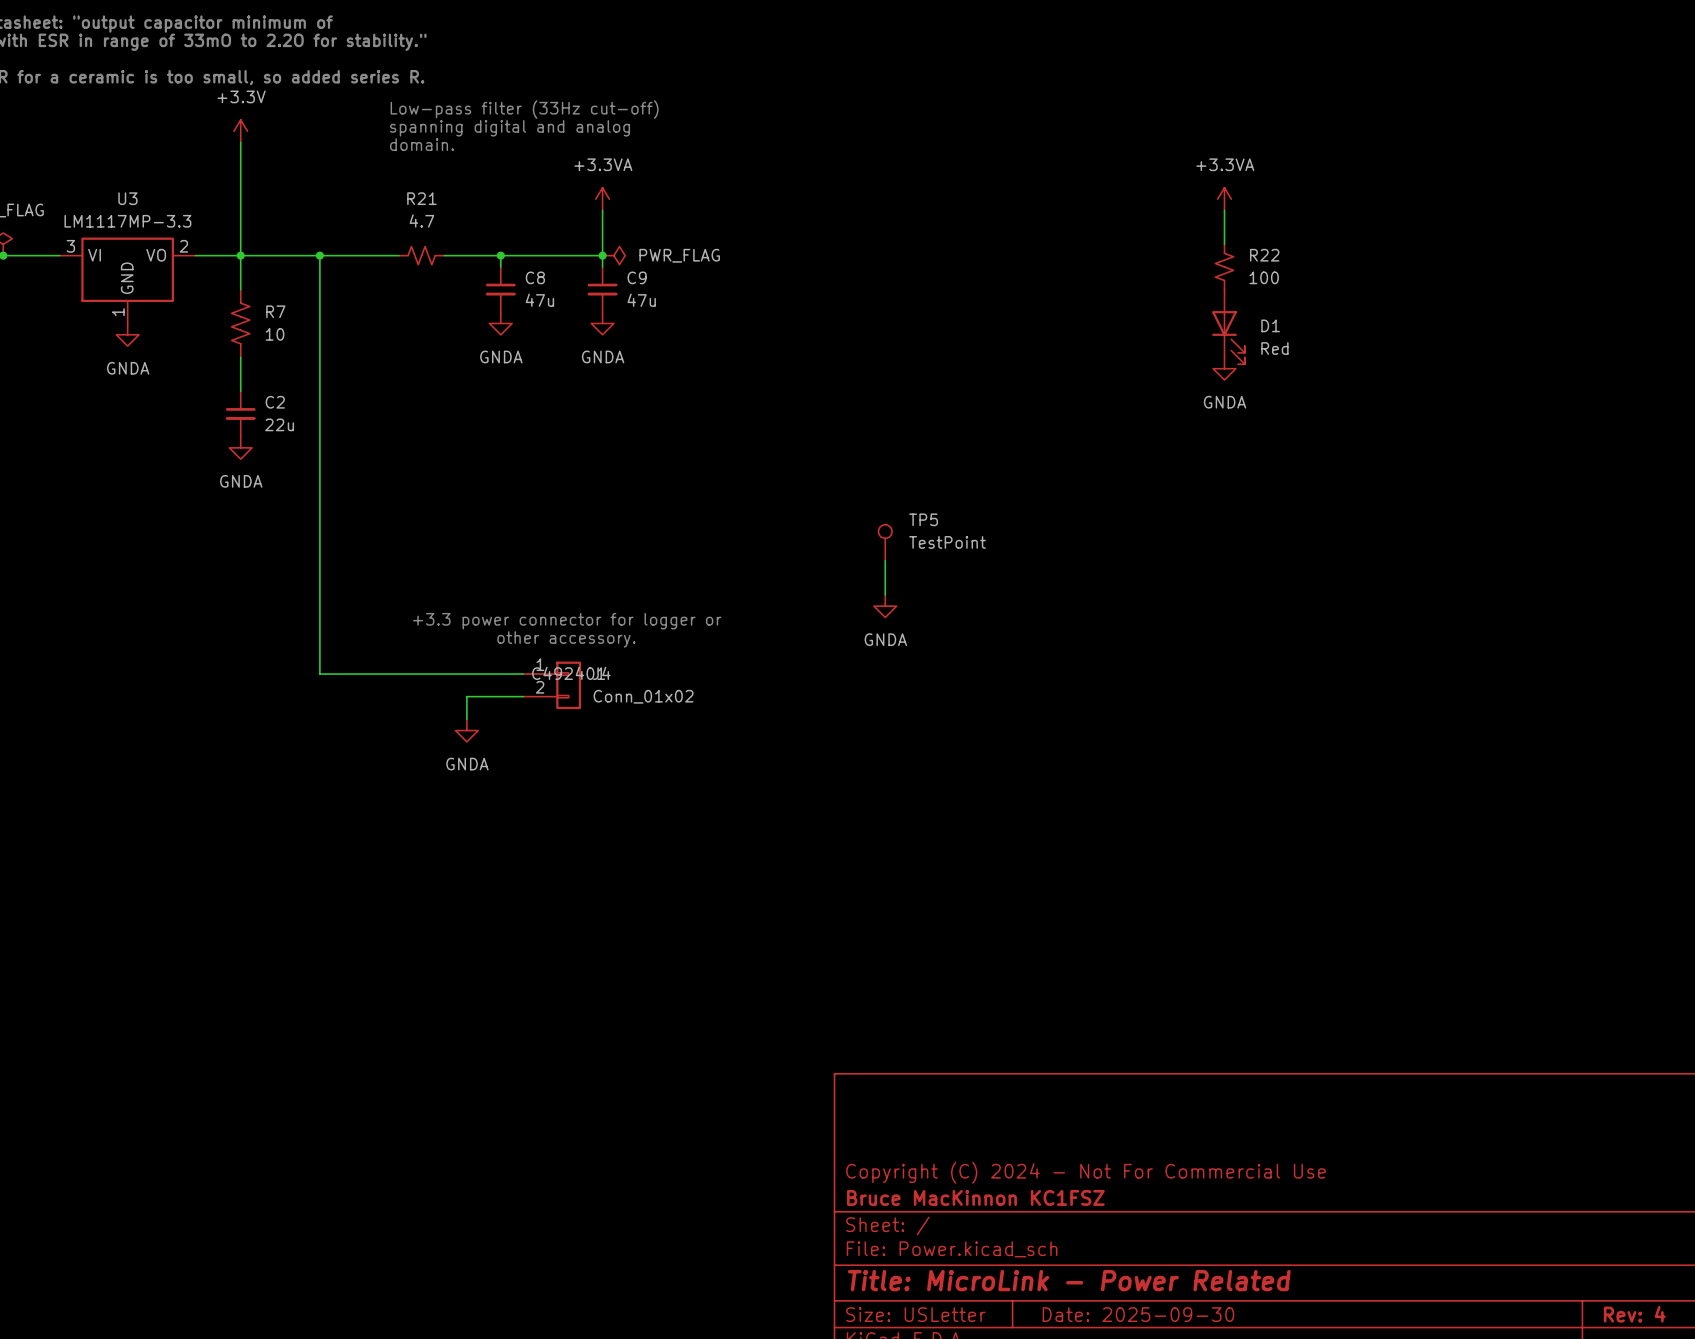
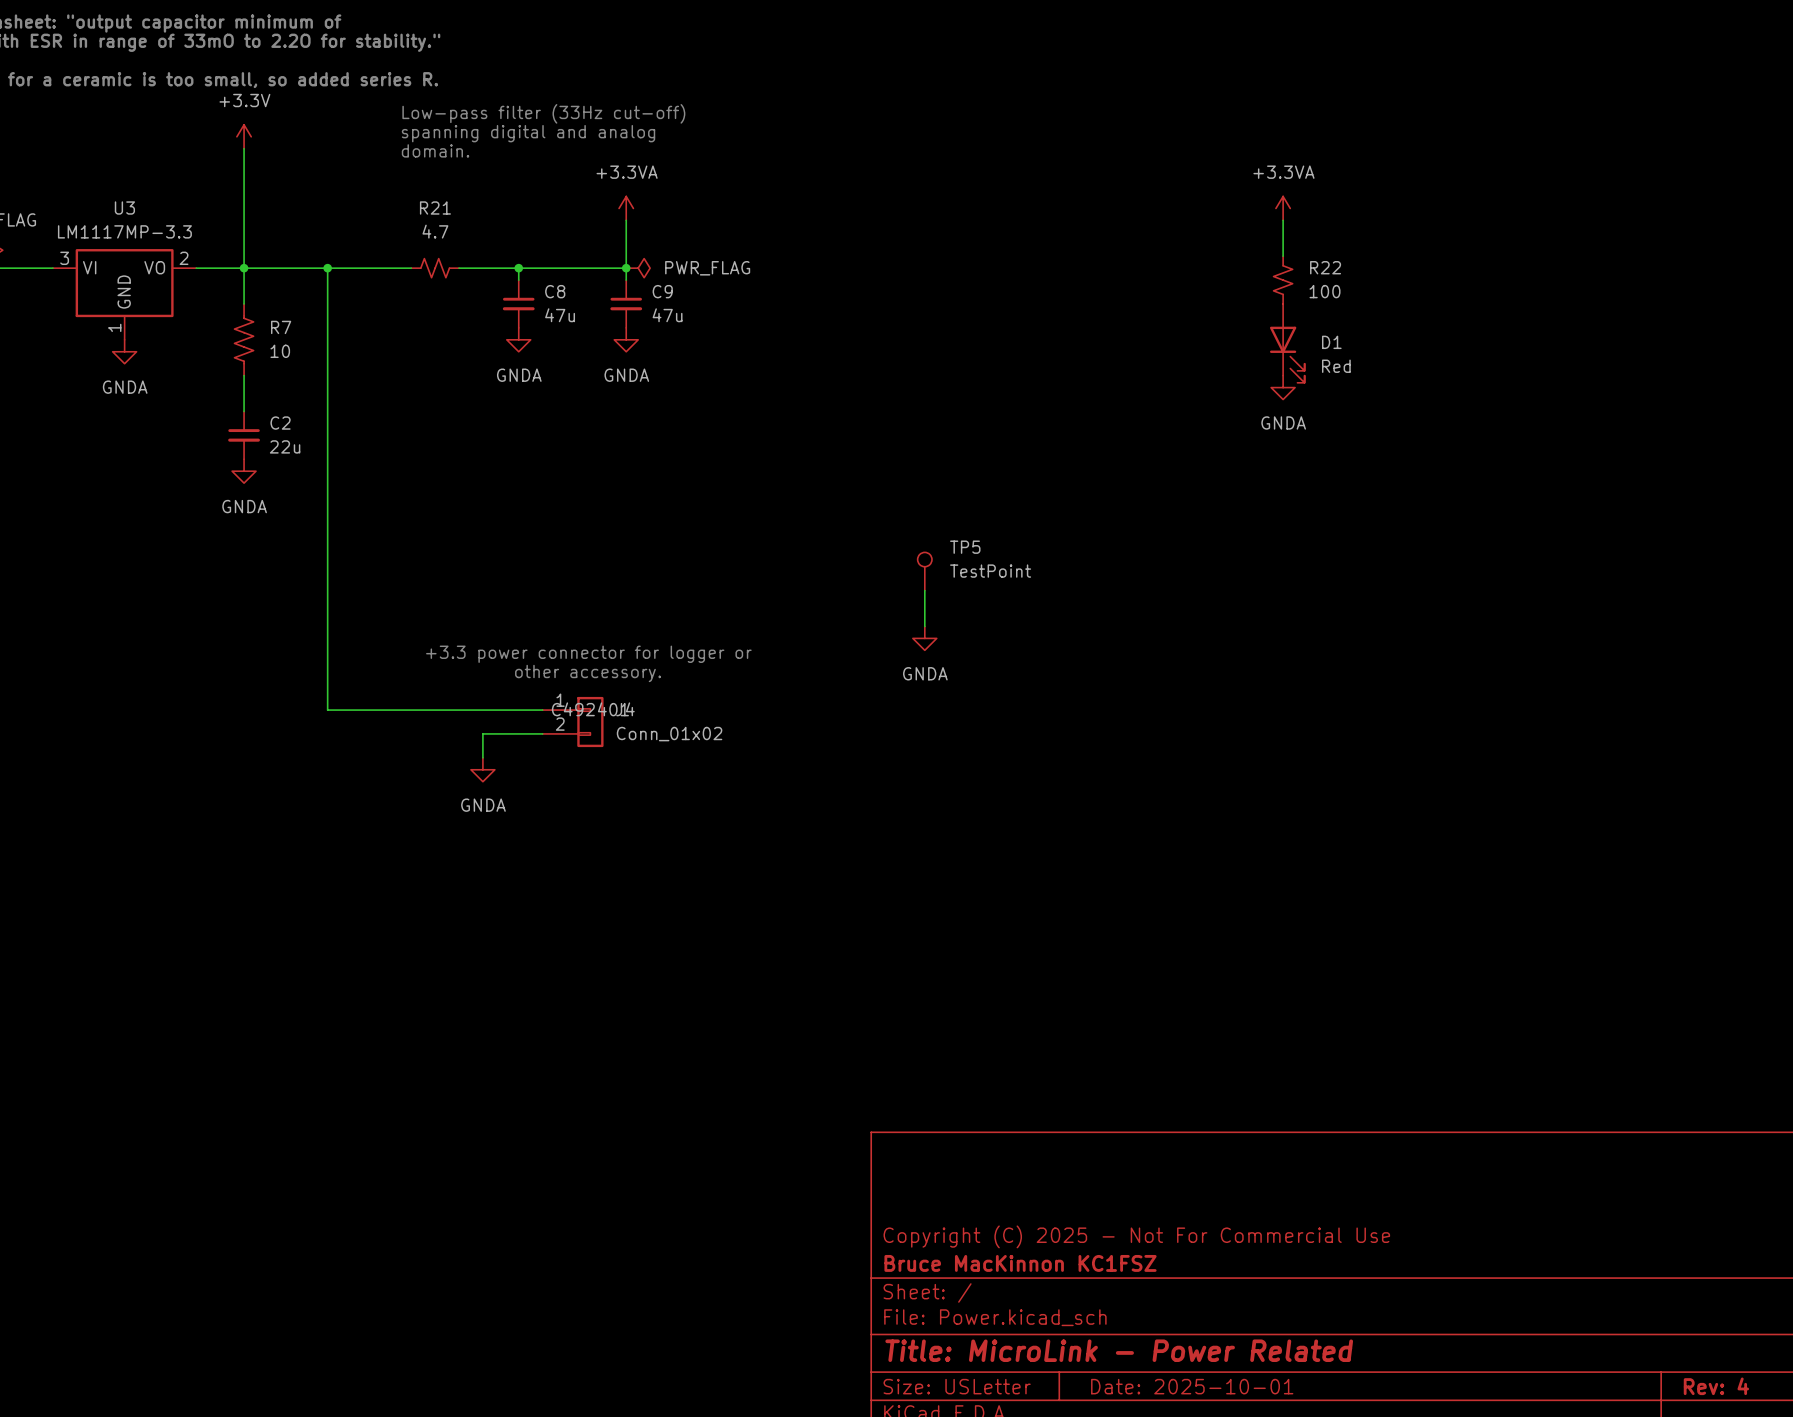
title block: Copyright (C) 2024 - Not For Commercial Use (1085, 1172) -> Copyright (C) 2025 - Not For Commercial Use (1136, 1236)
title block: Date: 2025-09-30 (1138, 1314) -> Date: 2025-10-01 (1192, 1386)

